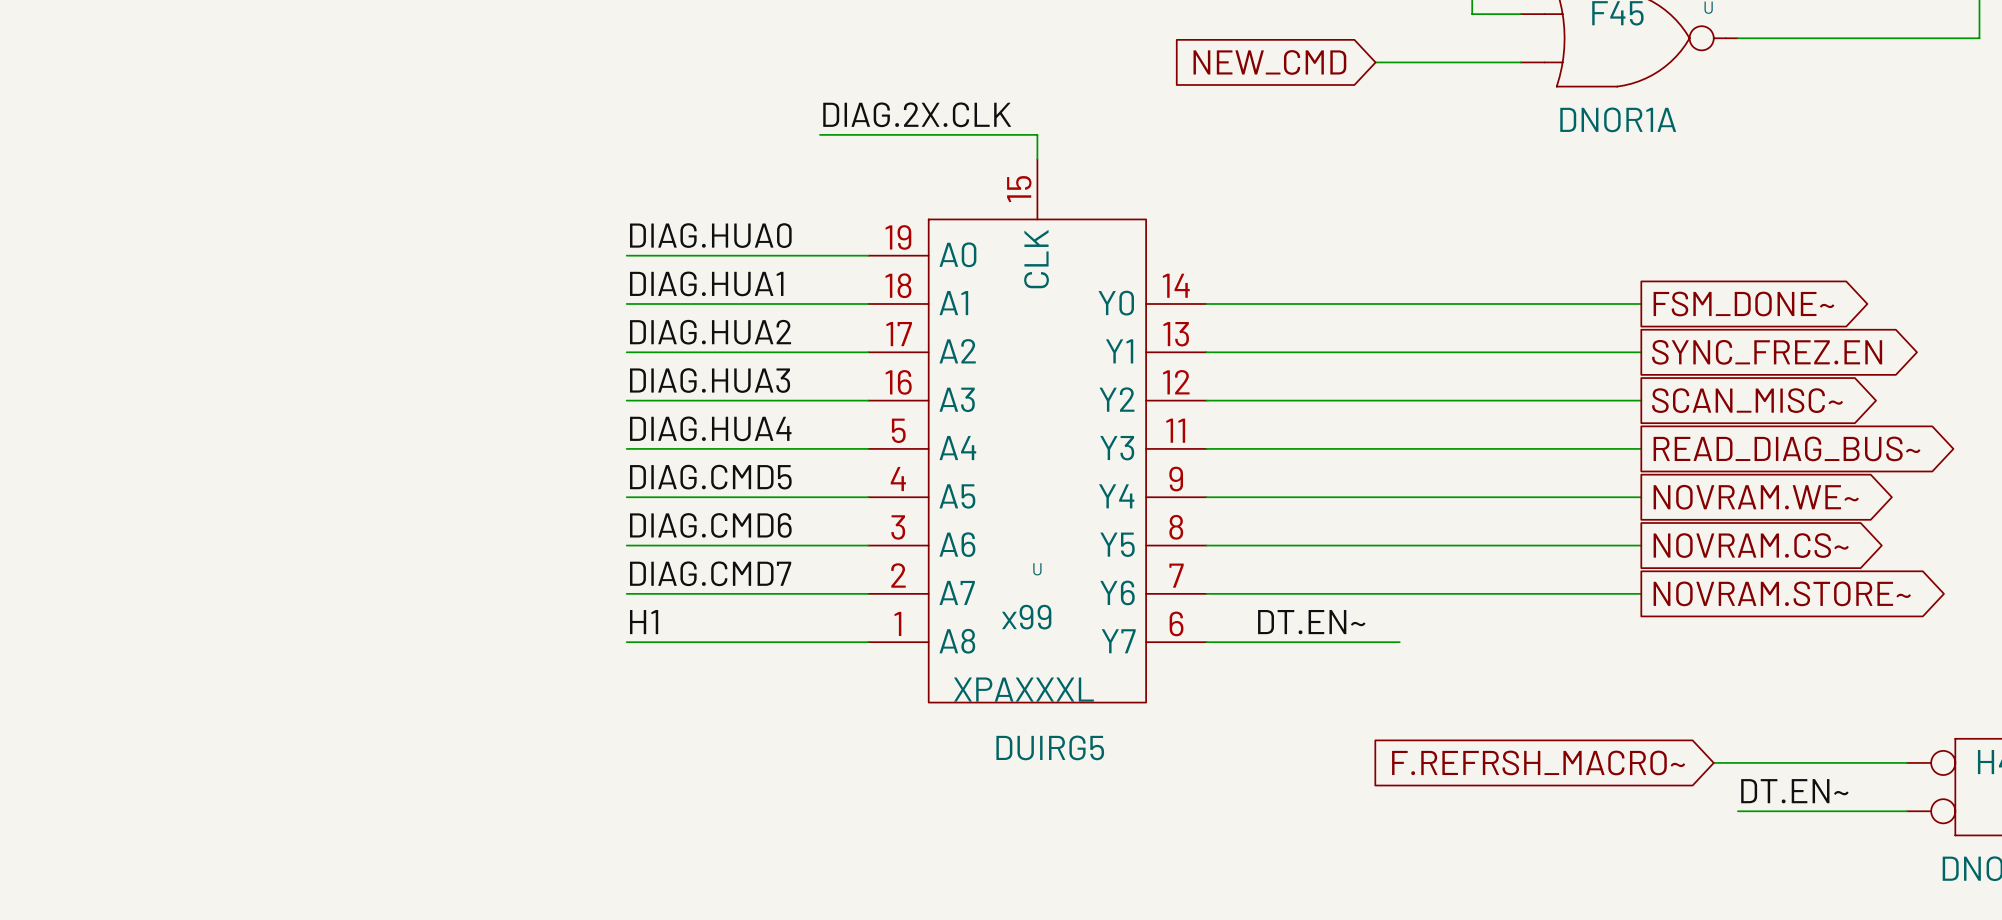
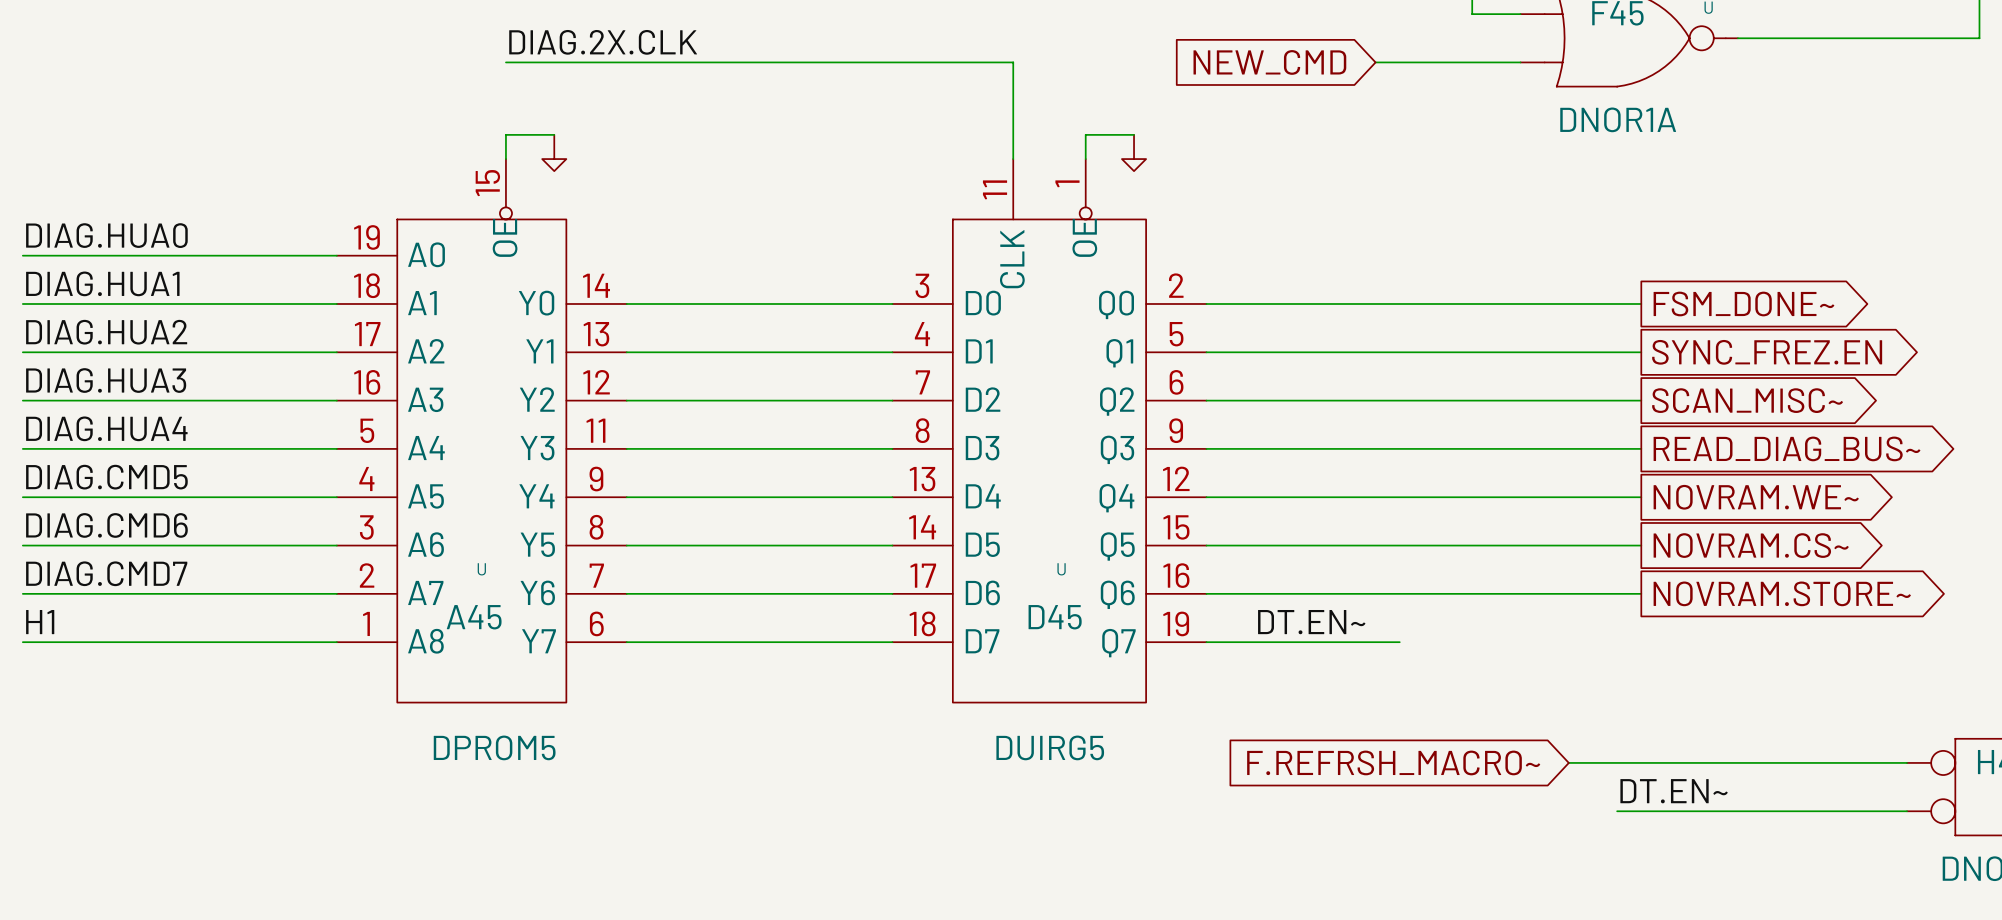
label: none -> DIAG.2X.CLK (603, 42)
wire: none -> (505, 62) (1013, 62) (1013, 159)
label: DIAG.2X.CLK (917, 114) -> none
wire: none -> (554, 134) (505, 134) (505, 159)
wire: (819, 134) (1037, 134) (1037, 159) -> none
wire: none -> (1134, 134) (1085, 134) (1085, 159)
power symbol: none -> (554, 153)
power symbol: none -> (1134, 153)
label: none -> DIAG.HUA0 (106, 235)
label: DIAG.HUA0 (710, 235) -> none
wire: none -> (22, 255) (336, 255)
wire: (626, 255) (868, 255) -> none
label: none -> DIAG.HUA1 (102, 283)
label: DIAG.HUA1 (706, 283) -> none
wire: none -> (22, 303) (336, 303)
label: none -> DIAG.HUA2 (106, 332)
label: DIAG.HUA2 (710, 332) -> none
wire: none -> (22, 352) (336, 352)
label: none -> DIAG.HUA3 (106, 380)
label: DIAG.HUA3 (710, 380) -> none
wire: none -> (22, 400) (336, 400)
label: none -> DIAG.HUA4 (106, 428)
label: DIAG.HUA4 (710, 428) -> none
U: none -> (481, 430)
U: XPAXXXL (1037, 430) -> none
U: none -> (1049, 430)
wire: none -> (22, 448) (336, 448)
label: none -> DIAG.CMD5 (106, 477)
label: DIAG.CMD5 (710, 477) -> none
wire: none -> (22, 497) (336, 497)
label: none -> DIAG.CMD6 (106, 525)
label: DIAG.CMD6 (710, 525) -> none
wire: none -> (22, 545) (336, 545)
label: none -> DIAG.CMD7 (106, 573)
label: DIAG.CMD7 (710, 573) -> none
wire: none -> (22, 593) (336, 593)
label: none -> H1 (40, 622)
label: H1 (644, 622) -> none
wire: none -> (22, 642) (336, 642)
global label position: F.REFRSH_MACRO~ (1538, 762) -> F.REFRSH_MACRO~ (1393, 762)
wire: none -> (1568, 762) (1713, 762)
label position: DT.EN~ (1794, 791) -> DT.EN~ (1674, 791)
wire: none -> (1617, 811) (1737, 811)

